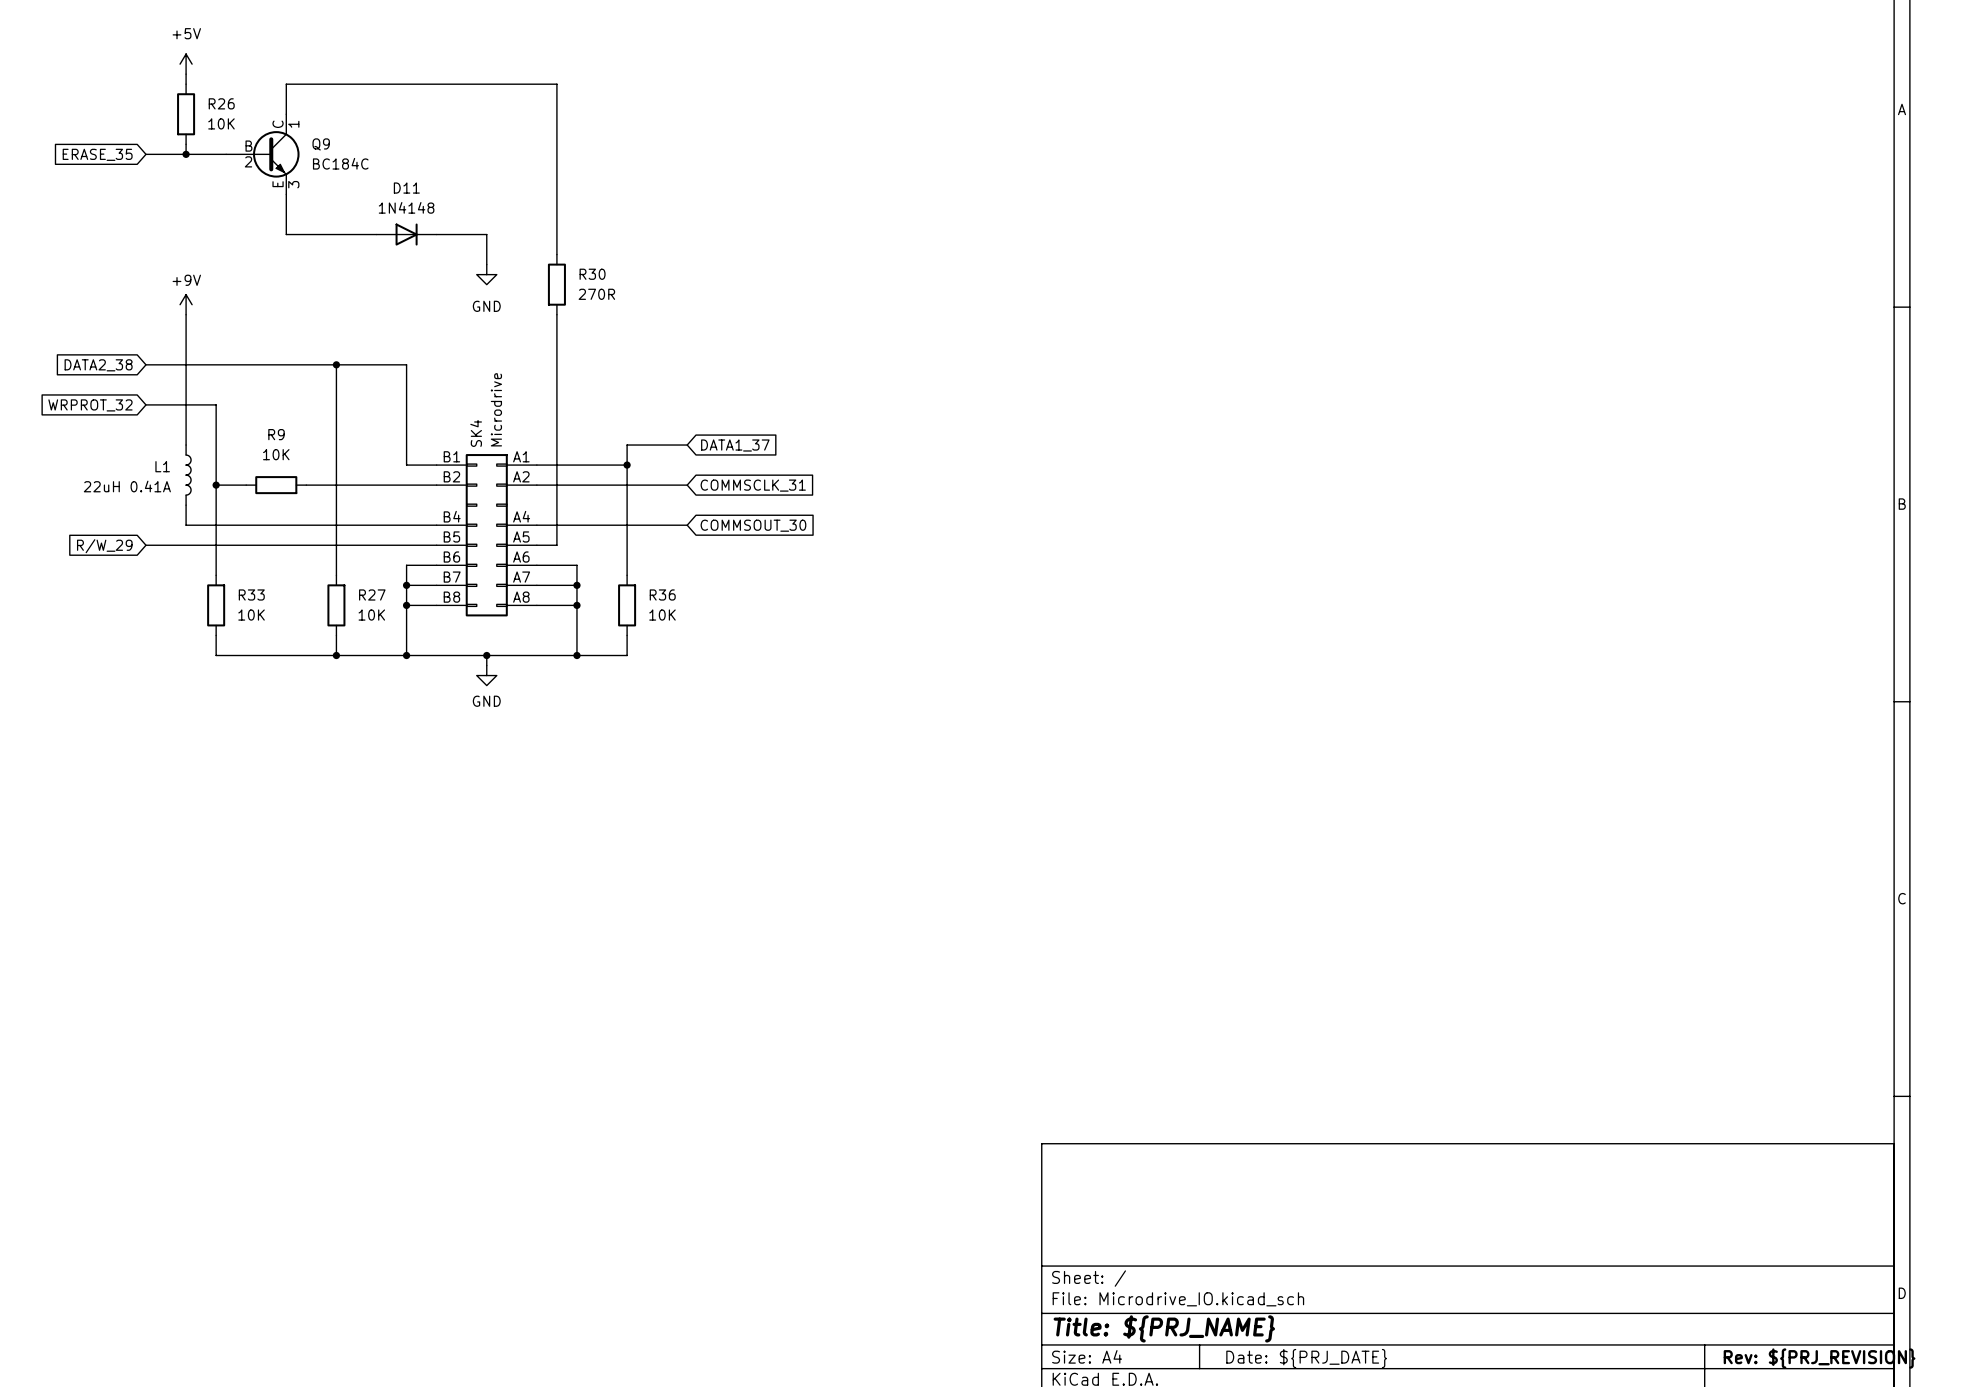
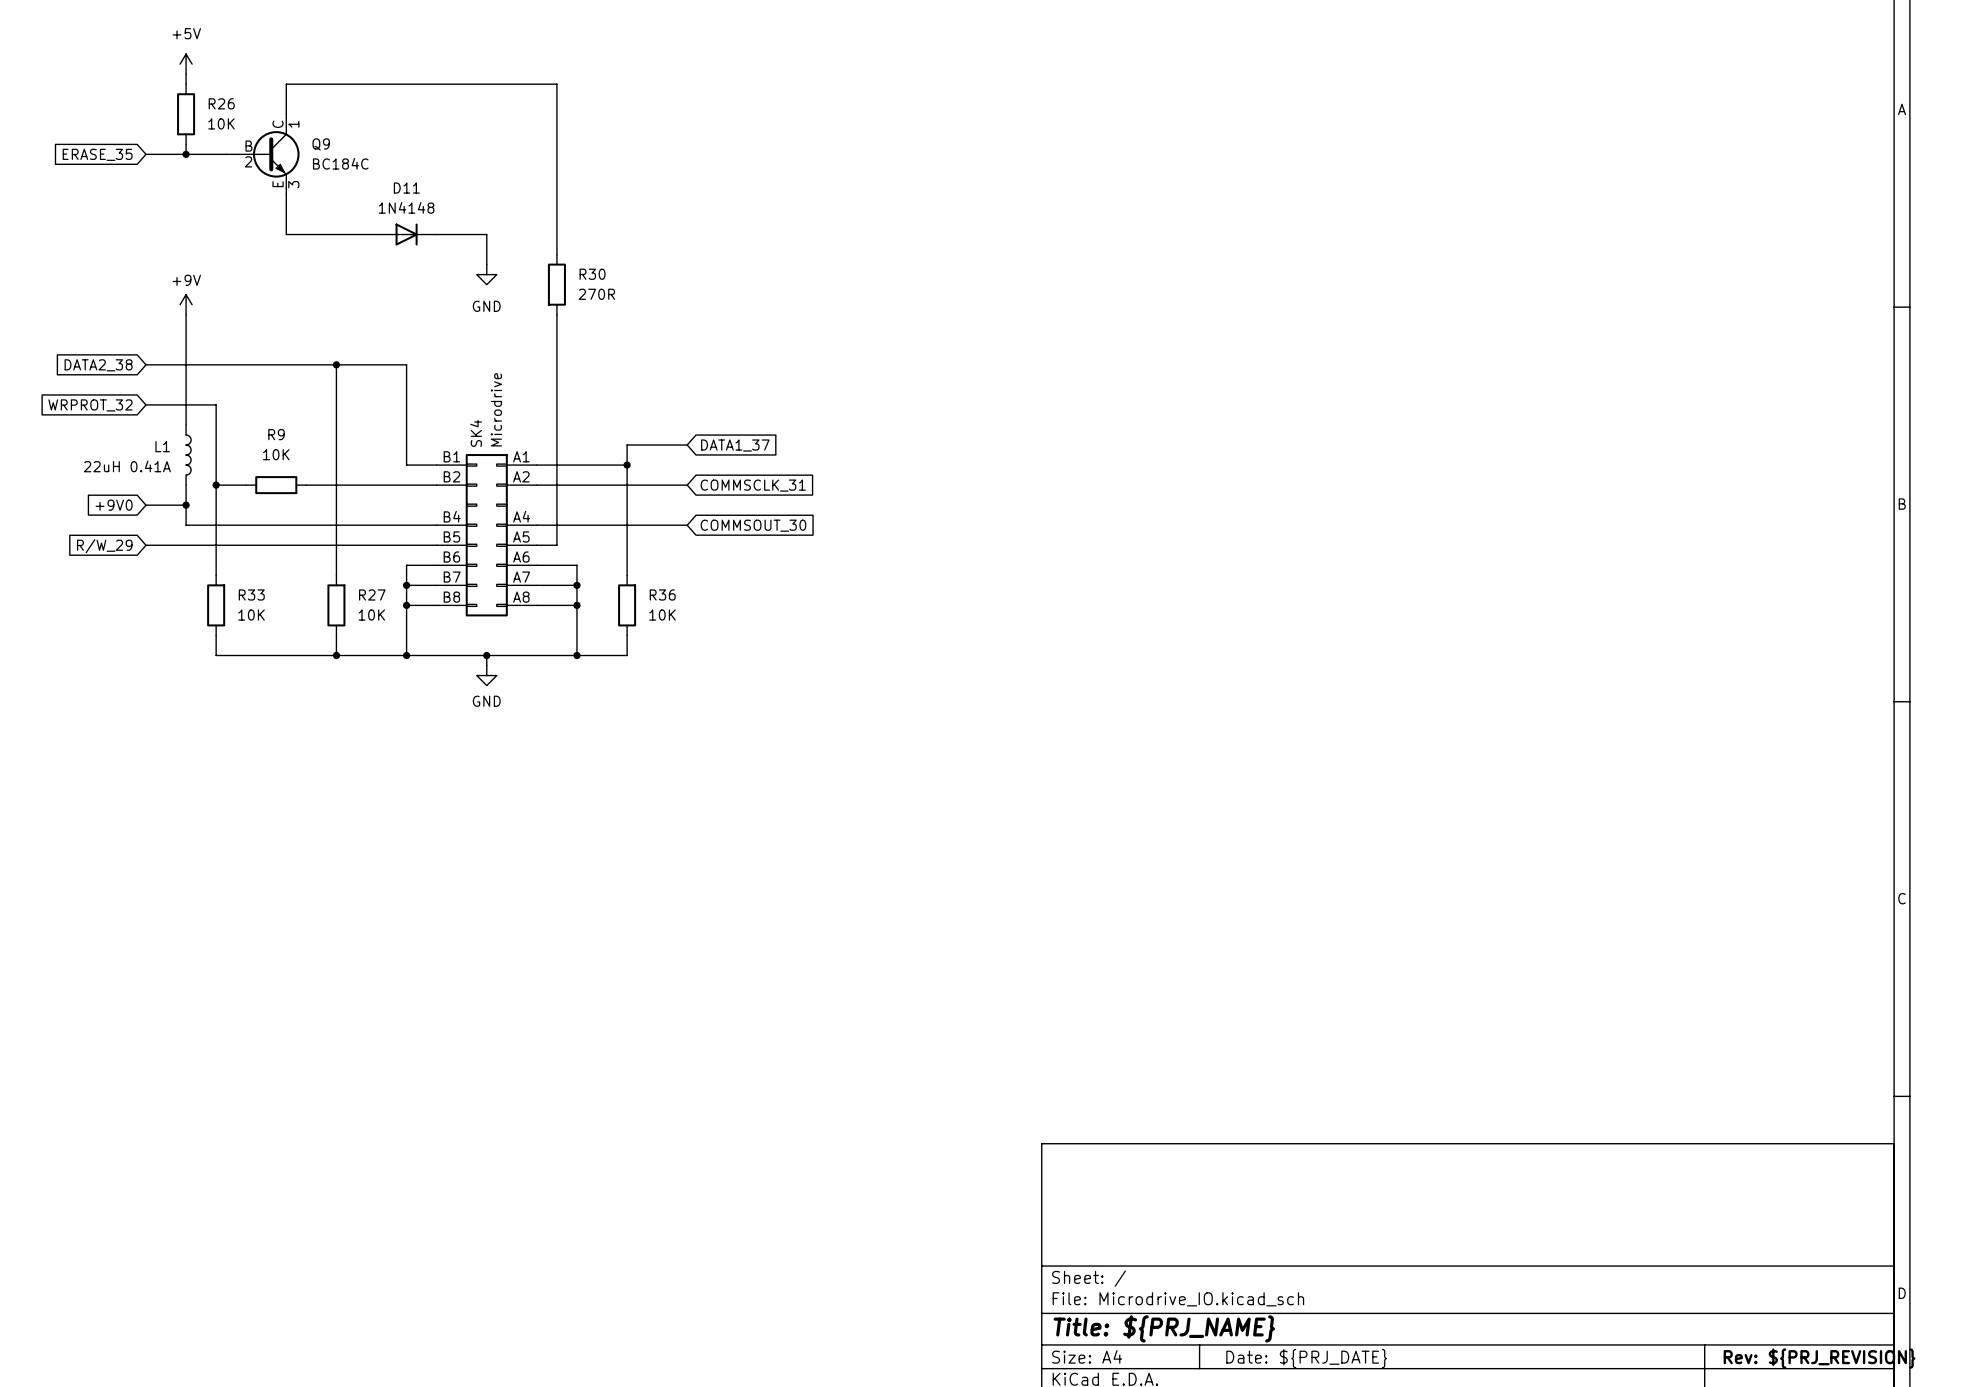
L1 position: (188, 475) -> (188, 455)
wire: none -> (186, 485) (186, 505) (145, 505)
global label: none -> +9V0 (114, 505)
junction: none -> (186, 505)

